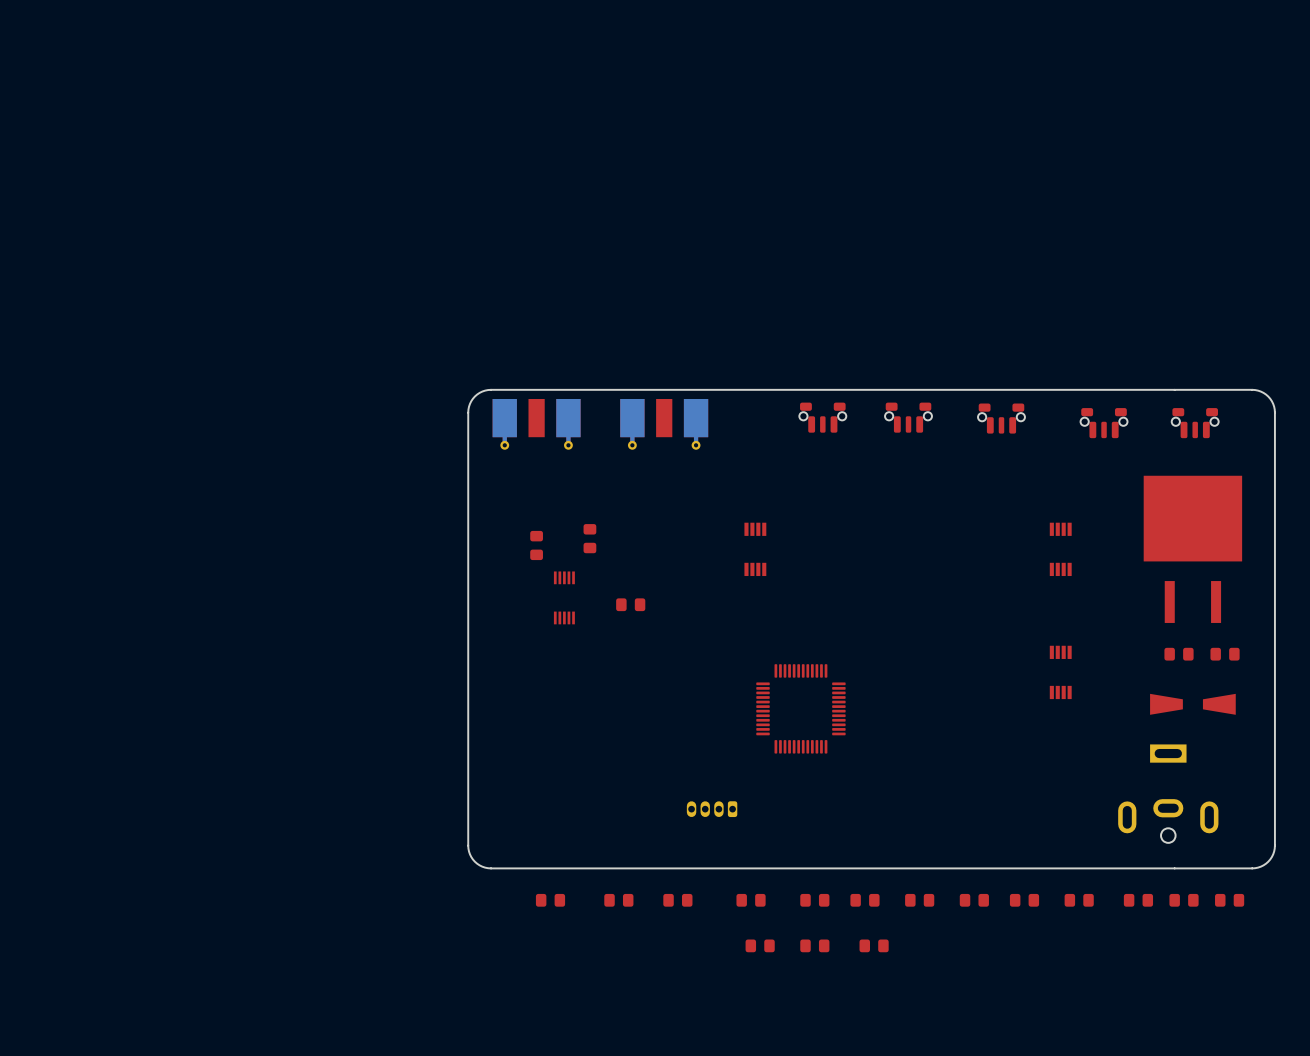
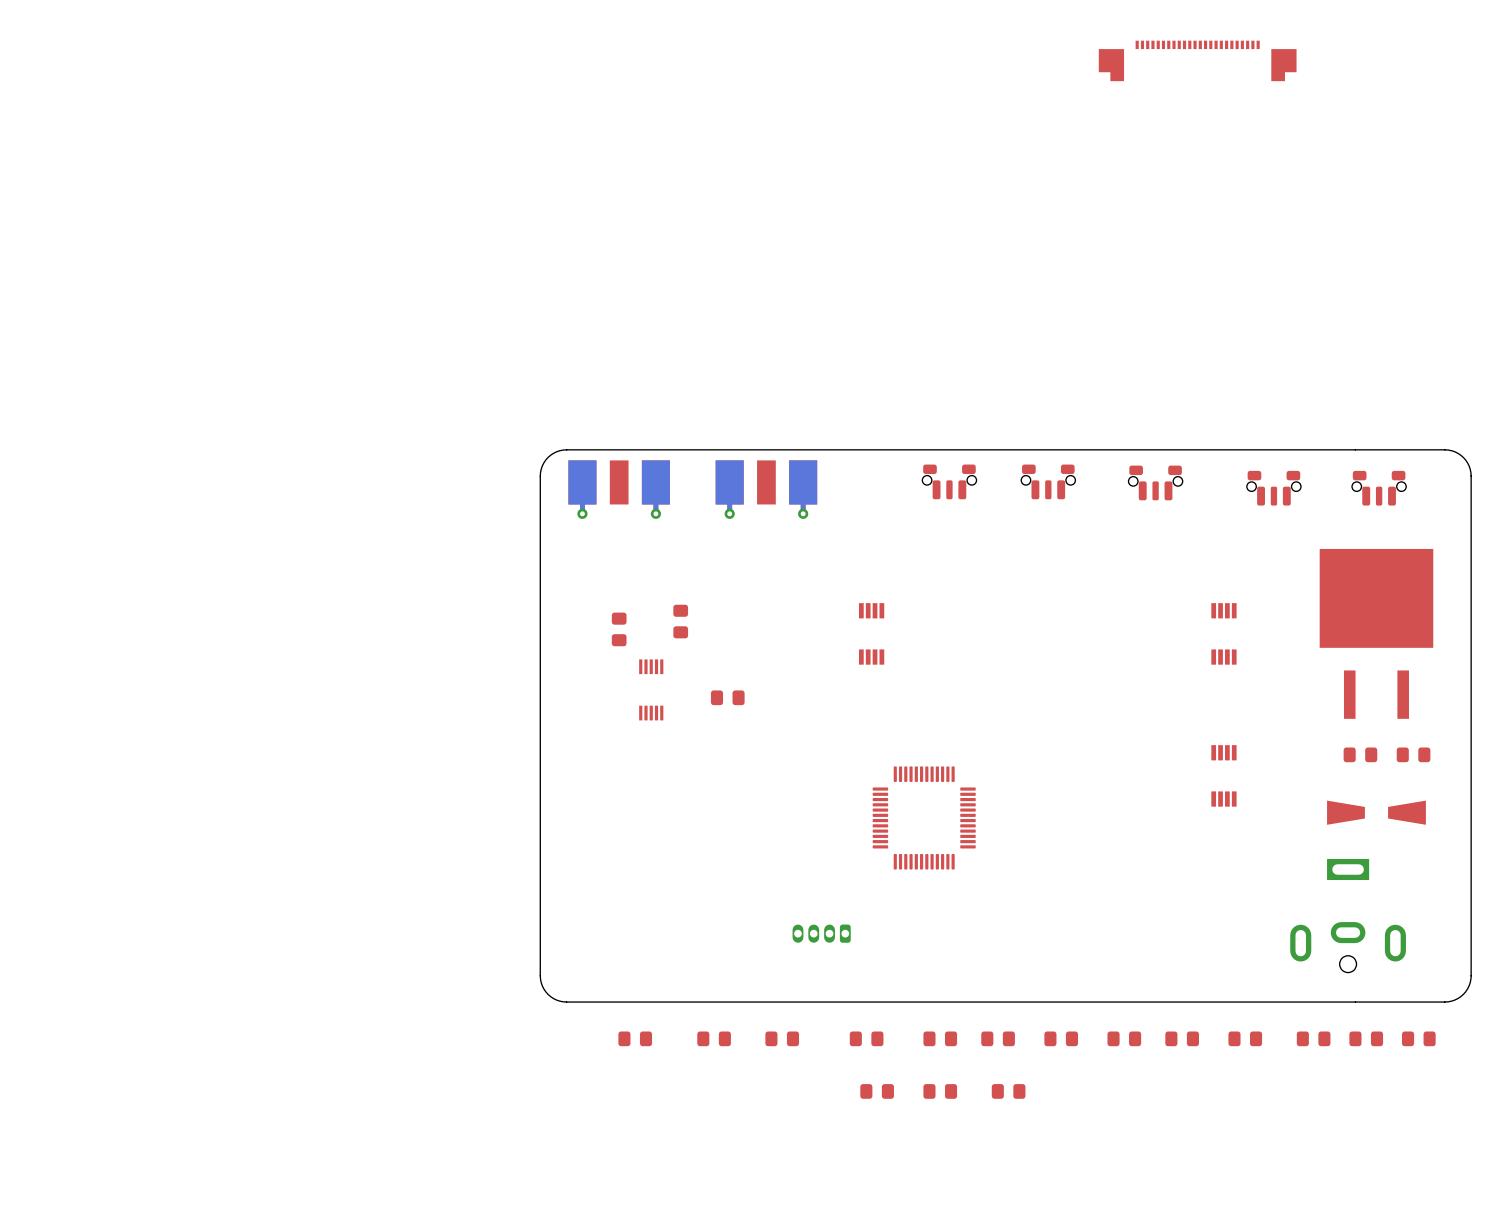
part: none -> (1197, 60)

